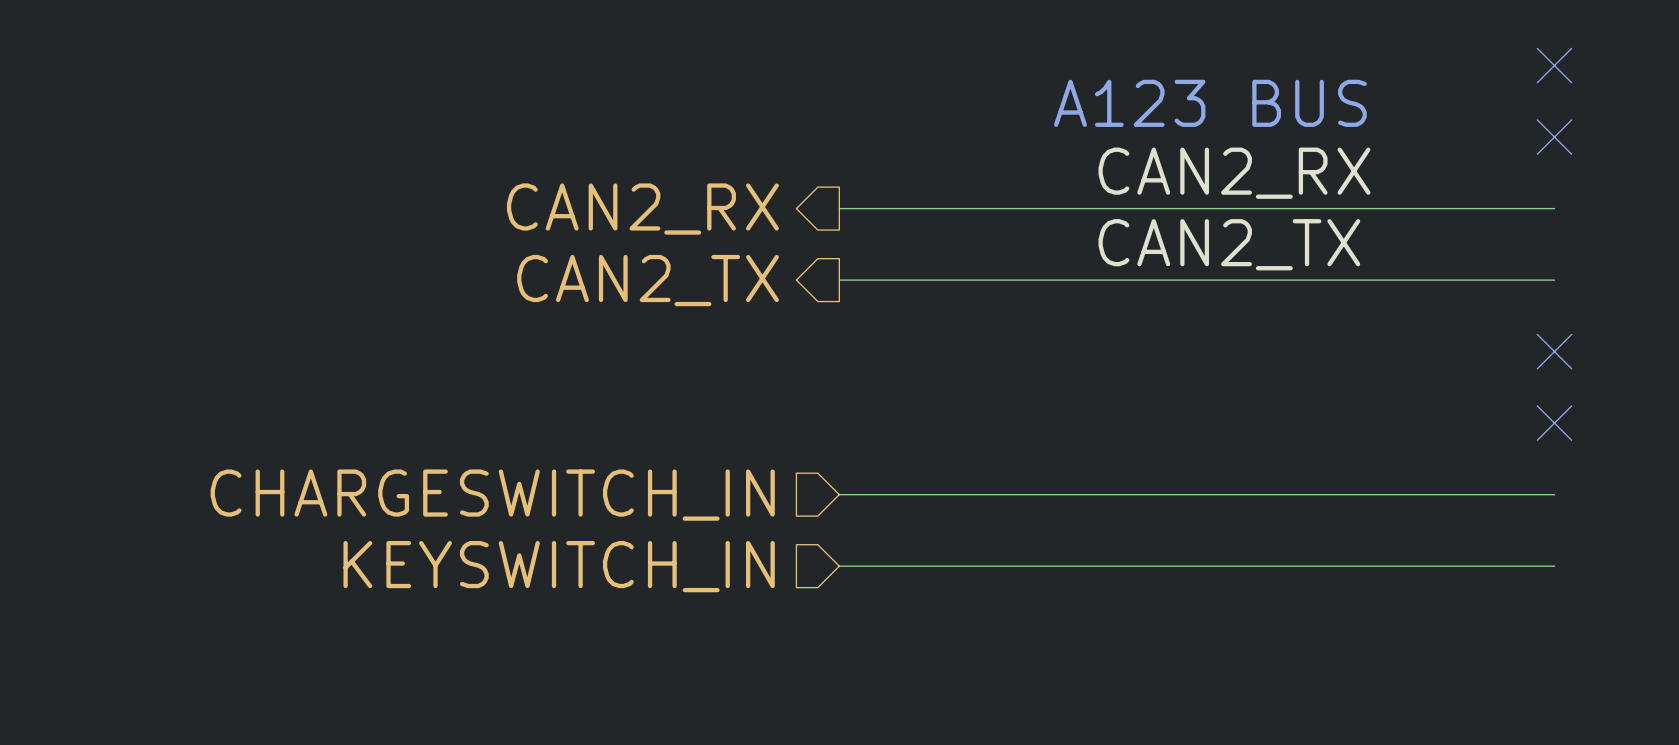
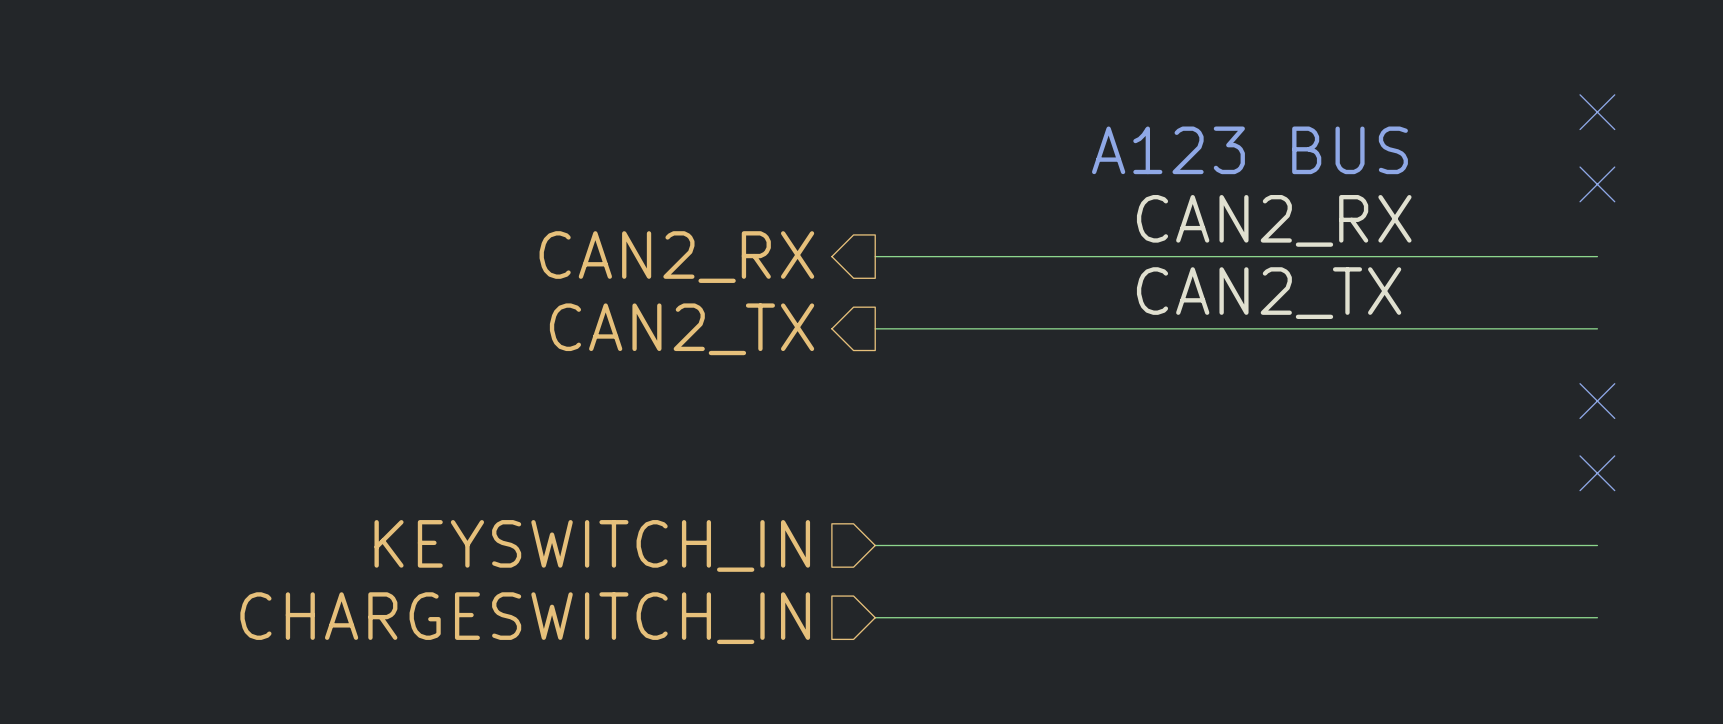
hierarchical label: CHARGESWITCH_IN (492, 495) -> KEYSWITCH_IN (592, 545)
hierarchical label: KEYSWITCH_IN (559, 566) -> CHARGESWITCH_IN (525, 618)

